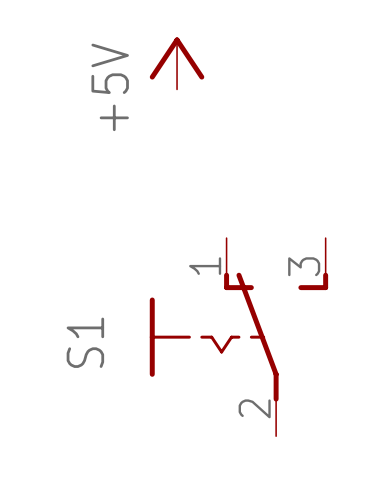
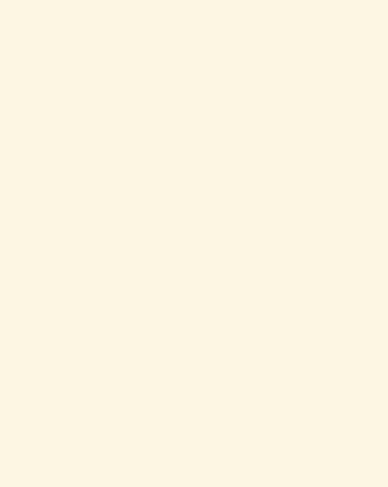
power symbol: +5V (177, 63) -> none
S1: (238, 337) -> none

